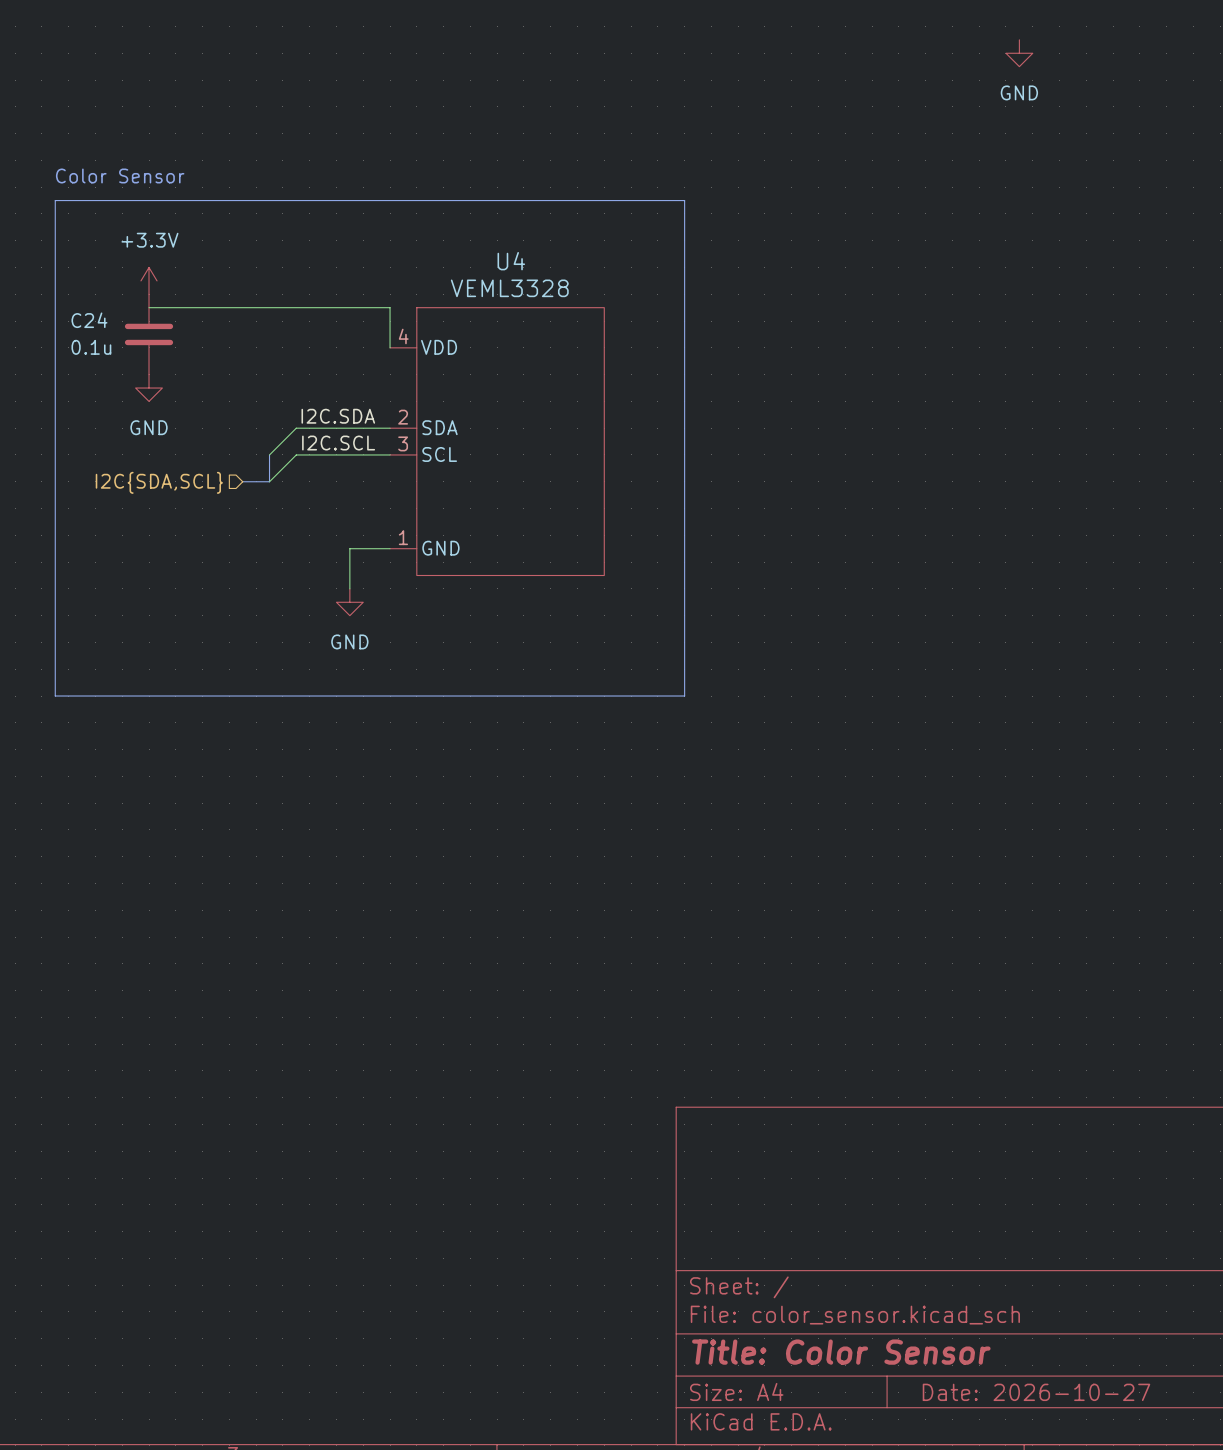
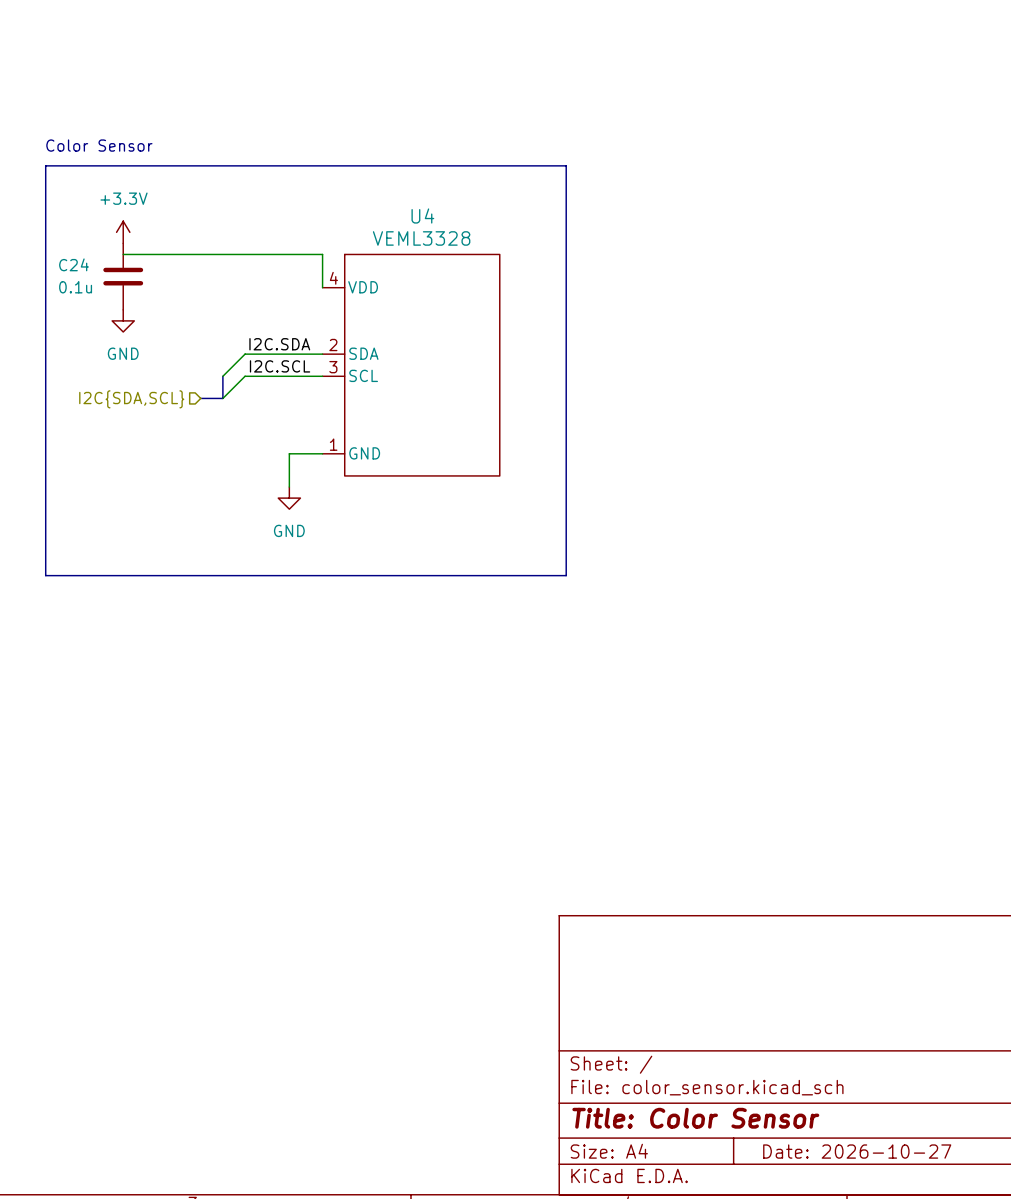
power symbol: GND (1019, 53) -> none

